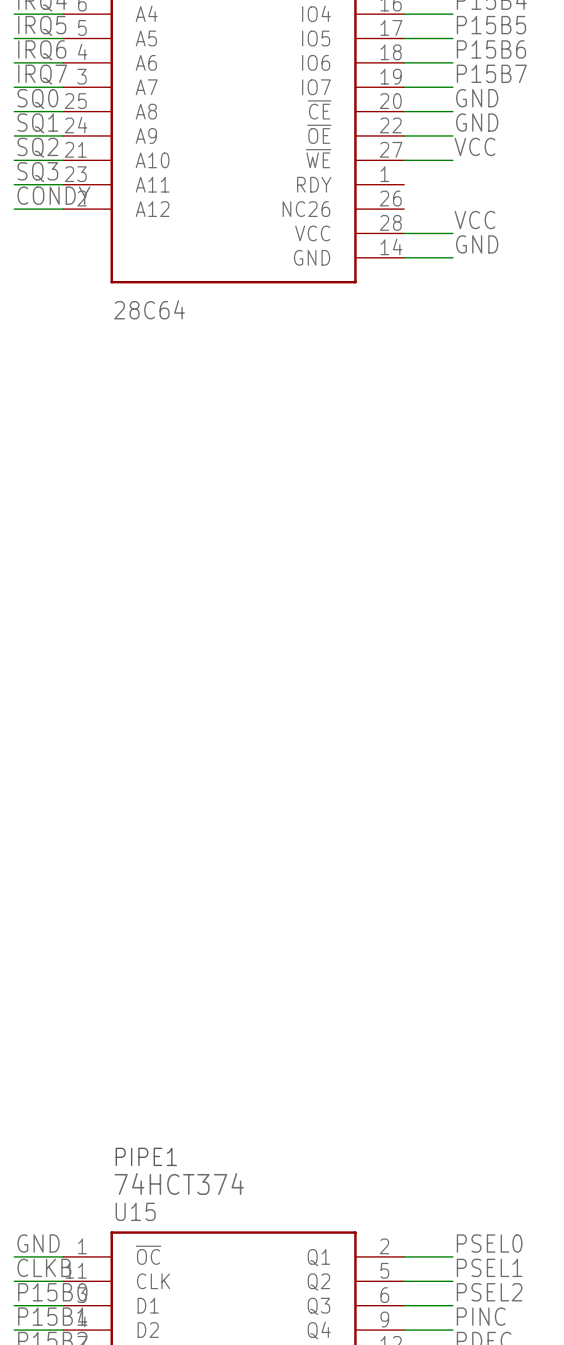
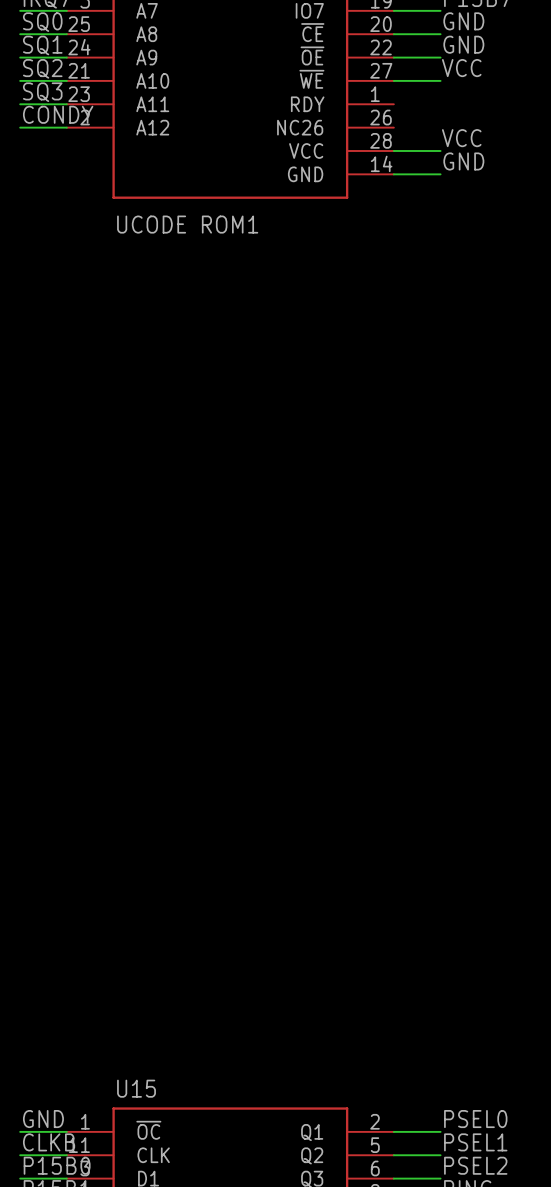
part value: 28C64 (149, 309) -> UCODE ROM1 (187, 224)
text: PIPE1 (146, 1156) -> none
text: 74HCT374 (179, 1183) -> none

